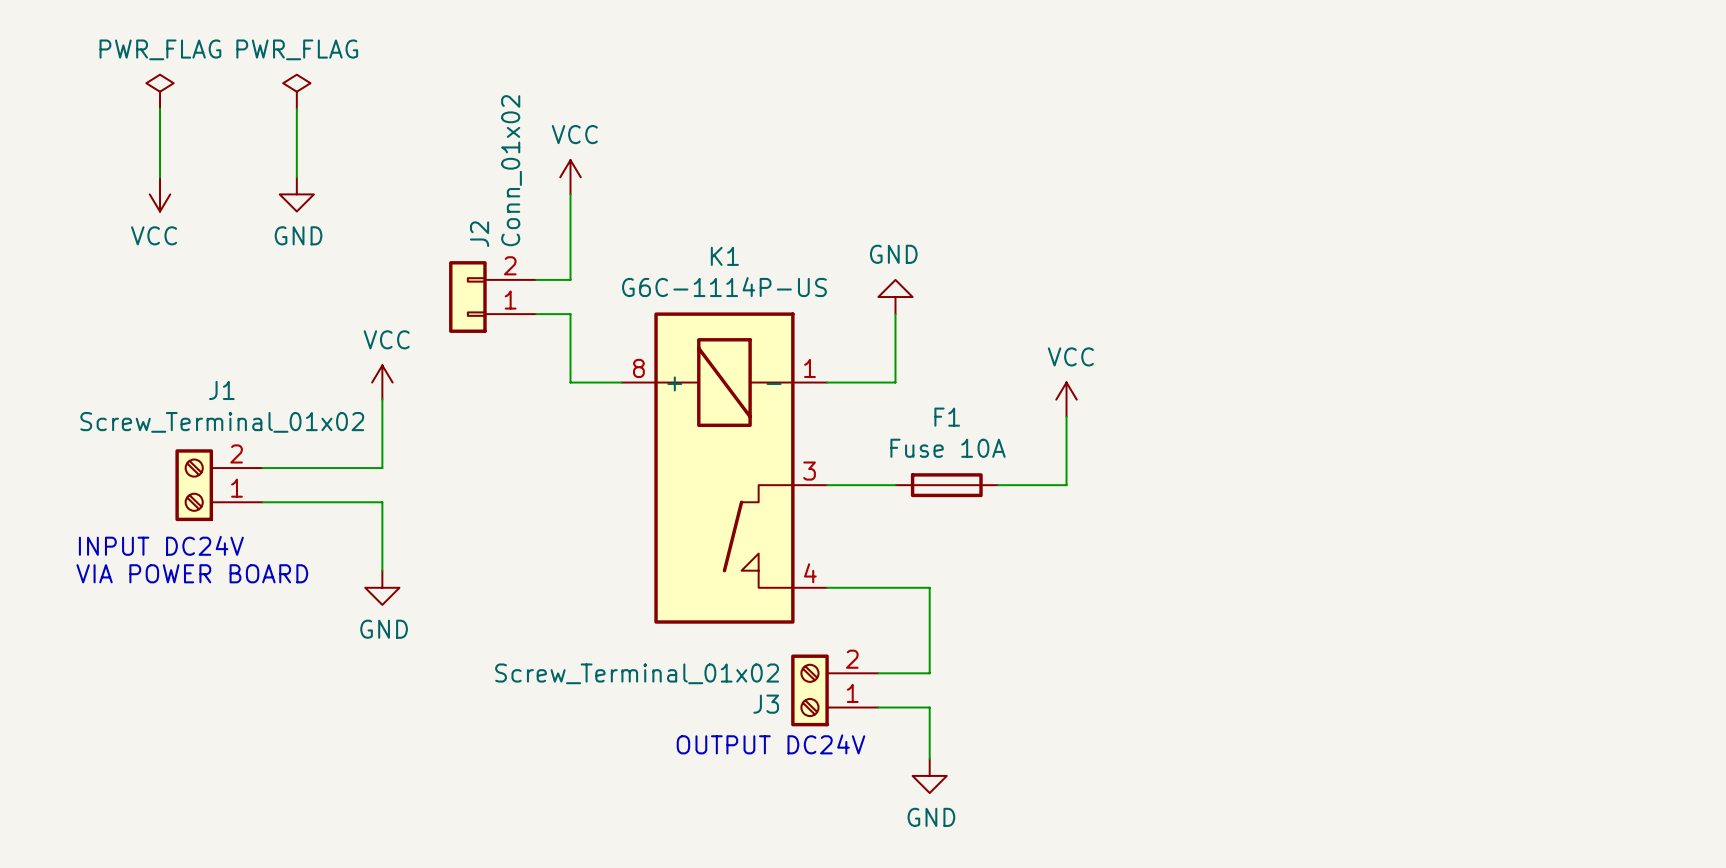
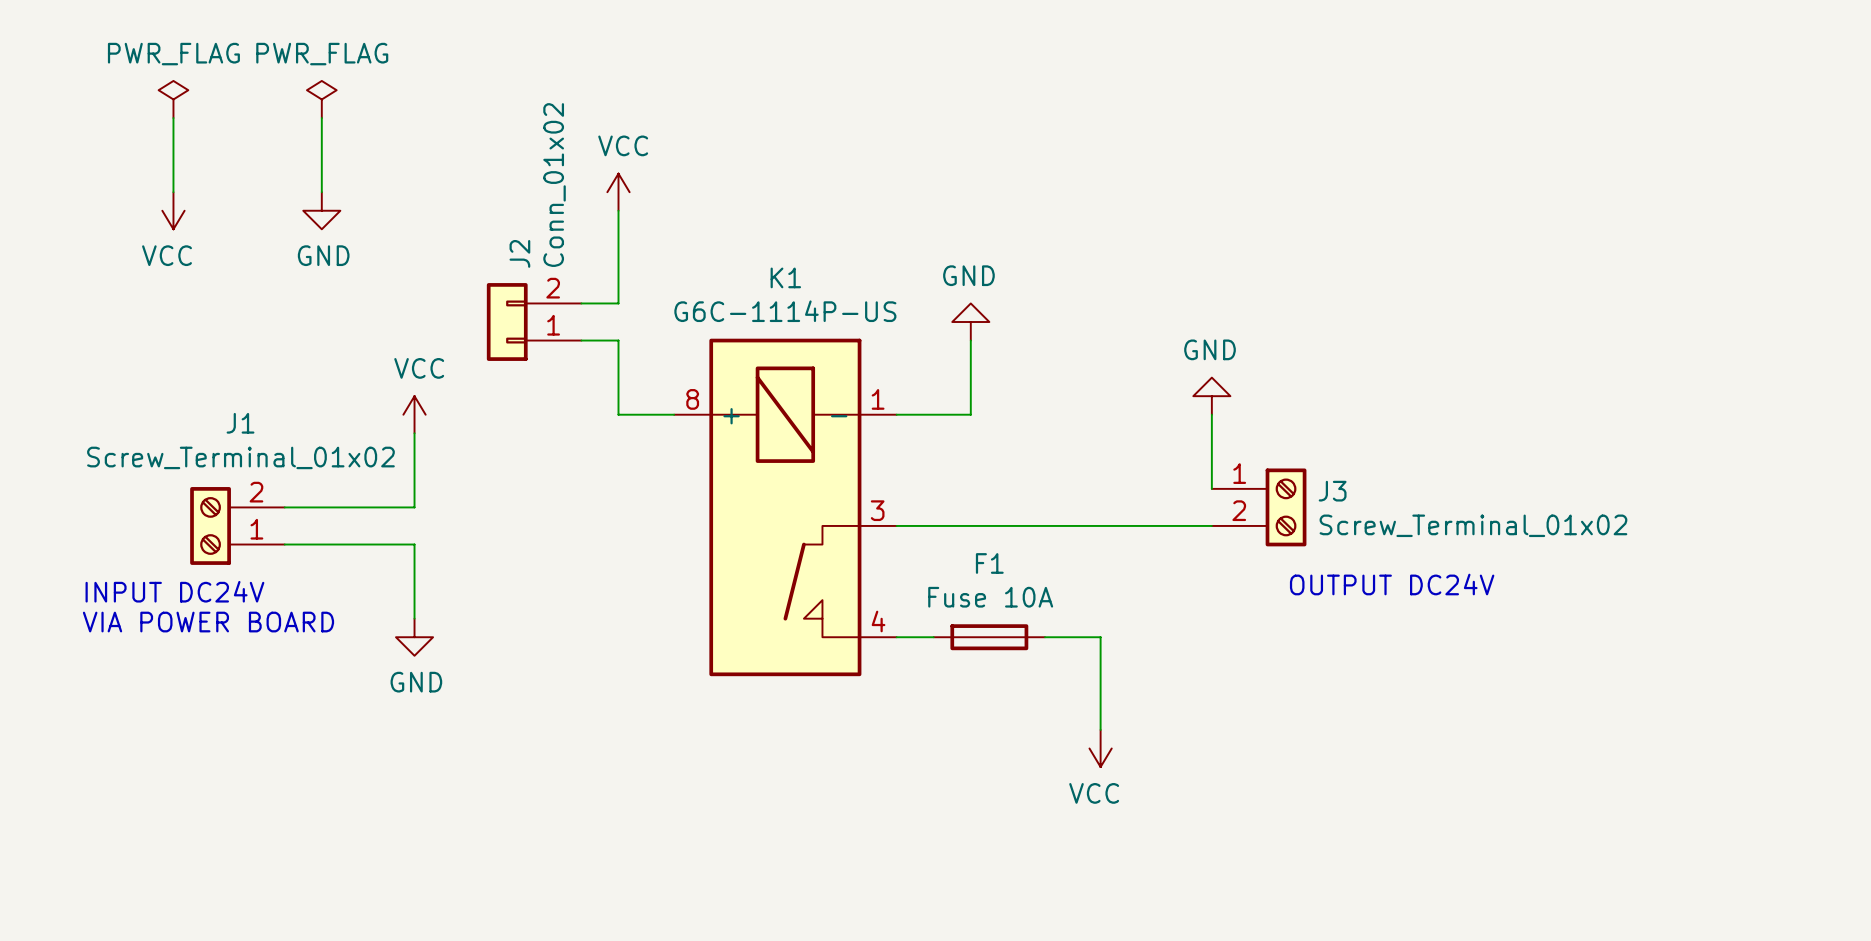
power symbol: none -> GND (1211, 396)
wire: none -> (1211, 414) (1211, 488)
power symbol rotation: 0° (1066, 399) -> 180° (1100, 748)
power symbol position: VCC (1066, 399) -> VCC (1100, 748)
wire: (1066, 416) (1066, 485) -> (1211, 525) (1156, 525)
F1 position: (946, 485) -> (989, 637)
text: none -> OUTPUT DC24V (1392, 584)
wire: (861, 587) (929, 587) (929, 673) (878, 673) -> none
wire: none -> (1044, 637) (1100, 637) (1100, 729)
J3 rotation: 0° (809, 690) -> 180° (1286, 507)
J3 position: (834, 690) -> (1259, 507)
wire: (878, 707) (929, 707) (929, 758) -> none
text: OUTPUT DC24V (771, 744) -> none
power symbol: GND (929, 775) -> none

